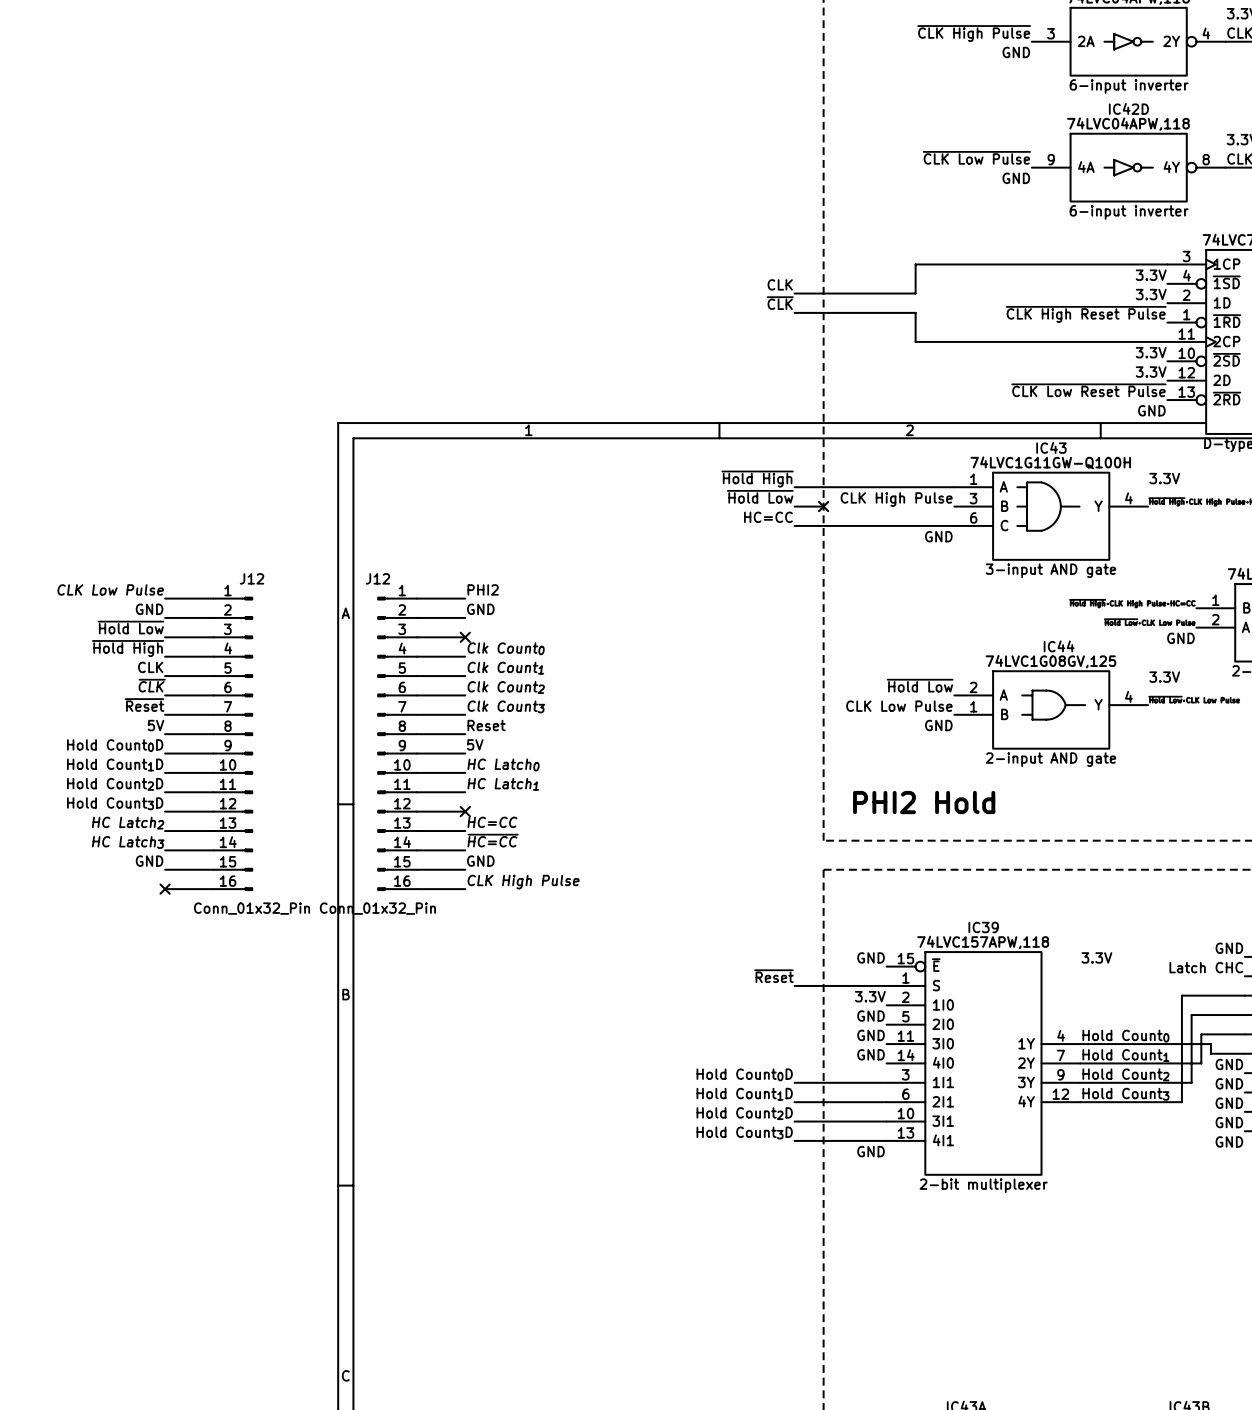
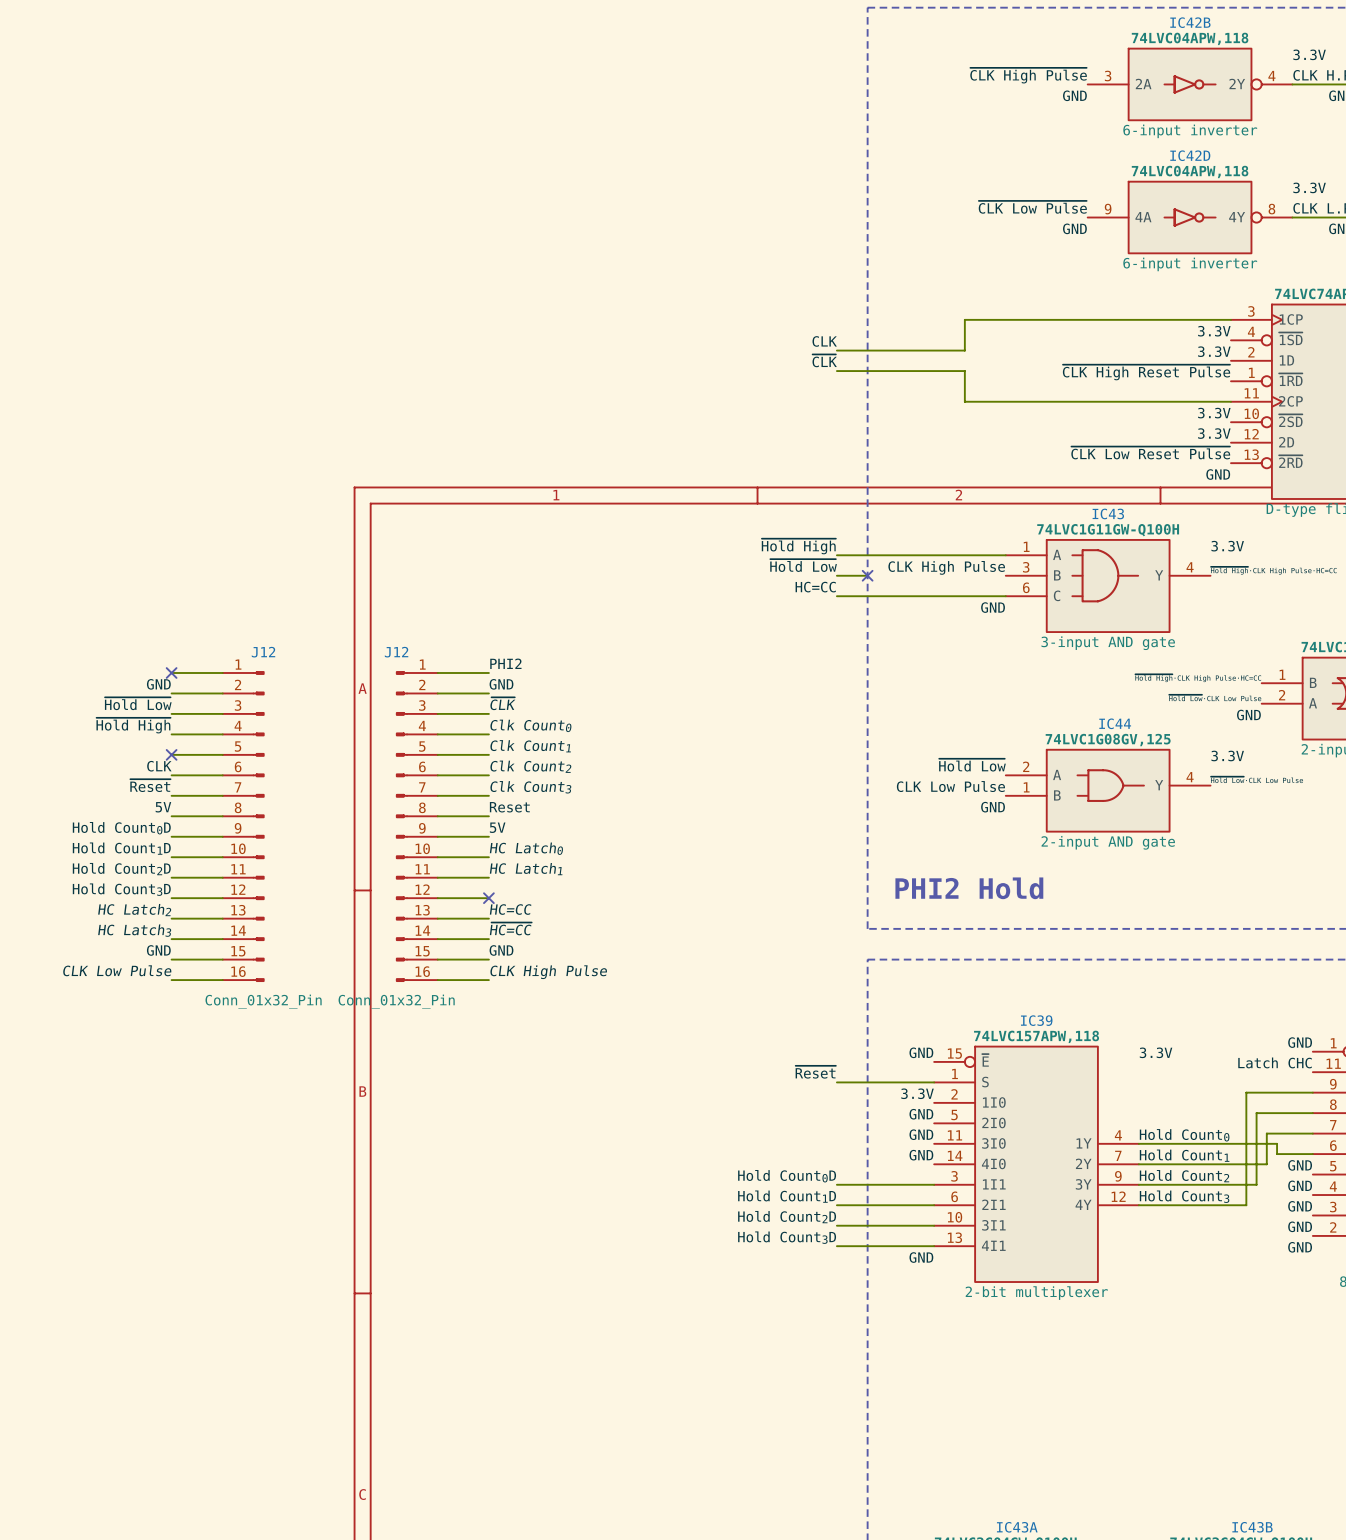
label: CLK Low Pulse (110, 589) -> none
no-connect mark: none -> (171, 672)
label: none -> ~{CLK} (502, 703)
no-connect mark: (465, 637) -> none
label: CLK (150, 667) -> none
no-connect mark: none -> (171, 754)
label: ~{CLK} (152, 685) -> CLK (159, 766)
label: none -> CLK Low Pulse (117, 970)
no-connect mark: (165, 889) -> none

